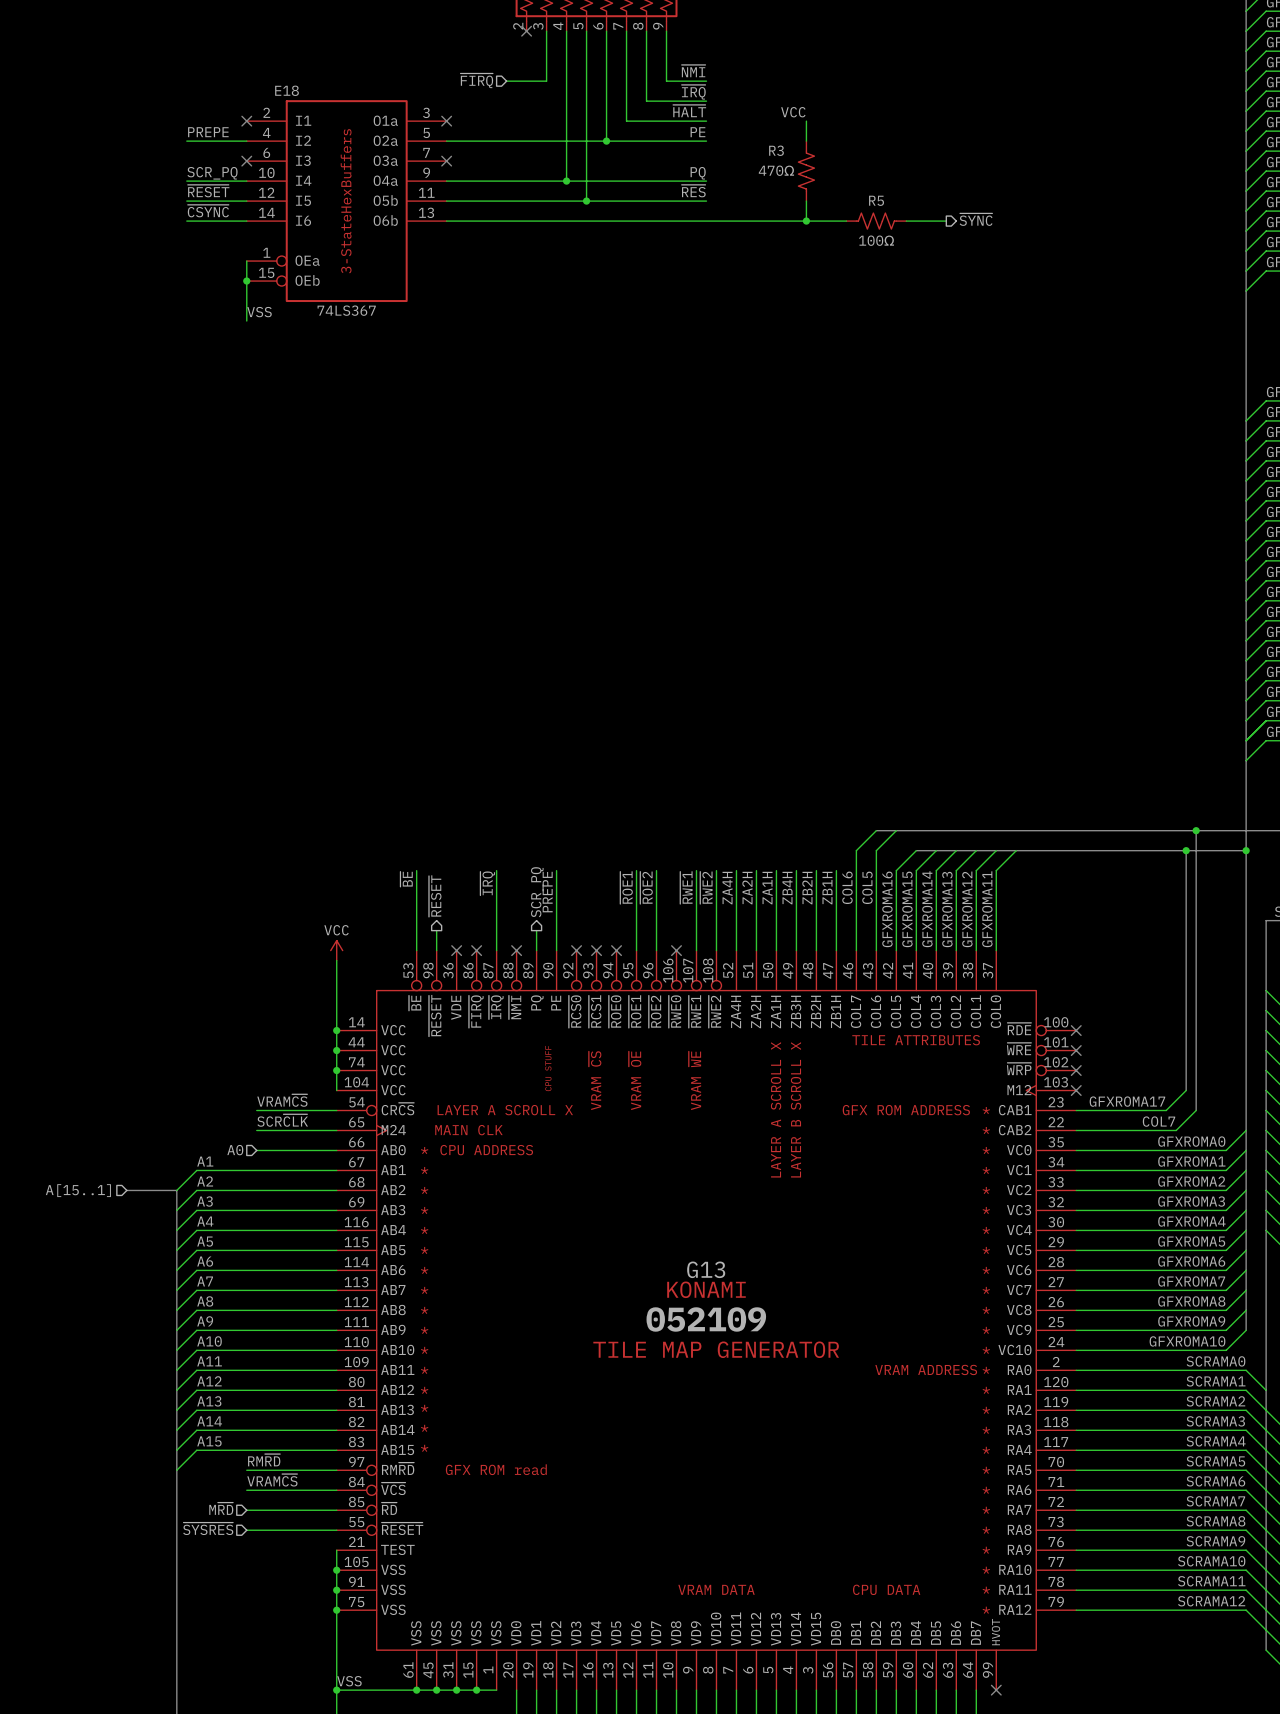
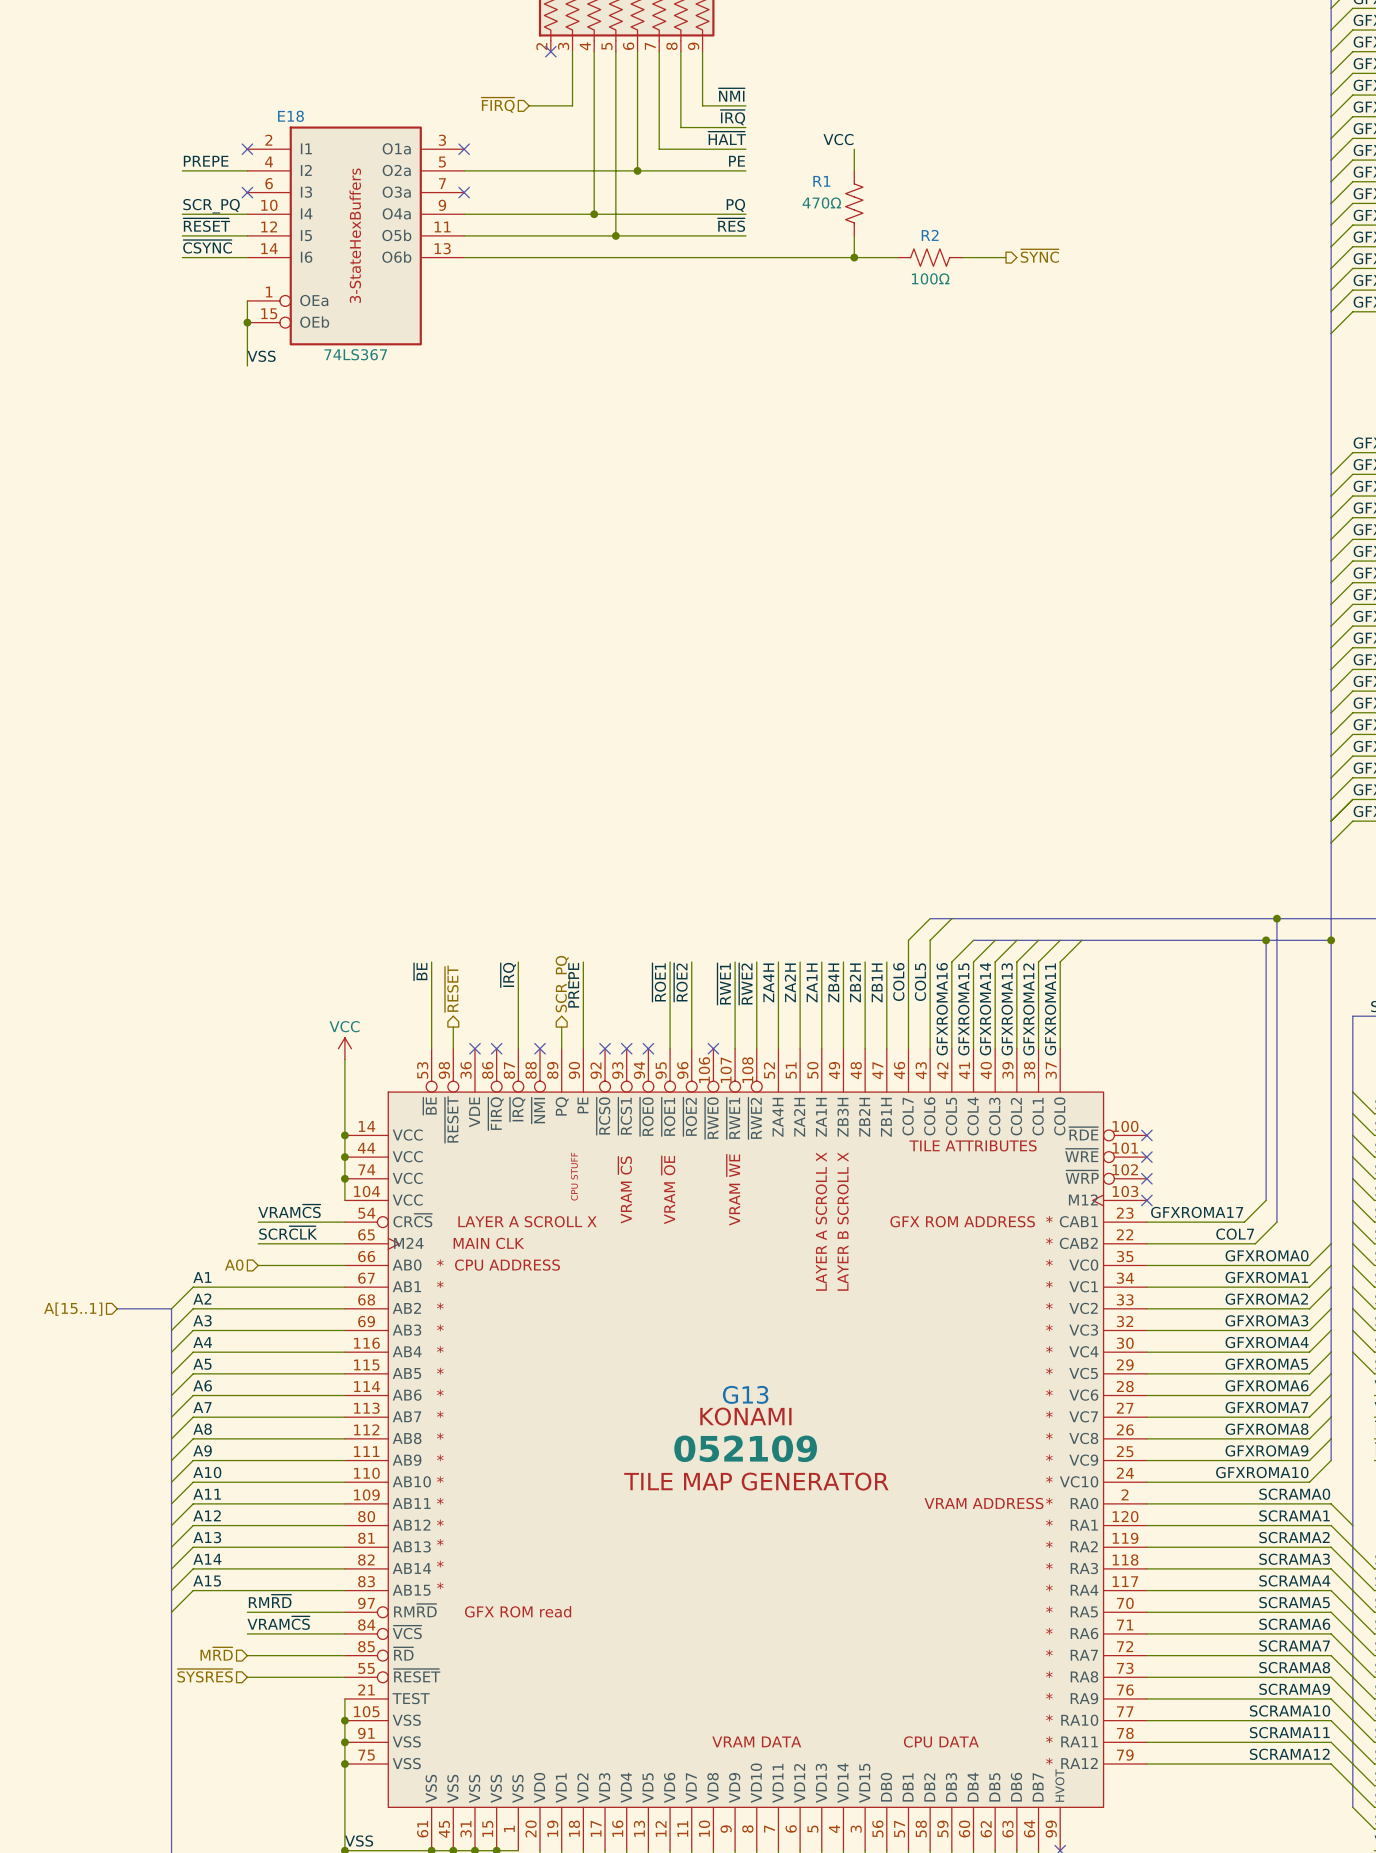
R3 name: R3 (776, 150) -> R1 (821, 181)
R5 name: R5 (876, 200) -> R2 (930, 235)

